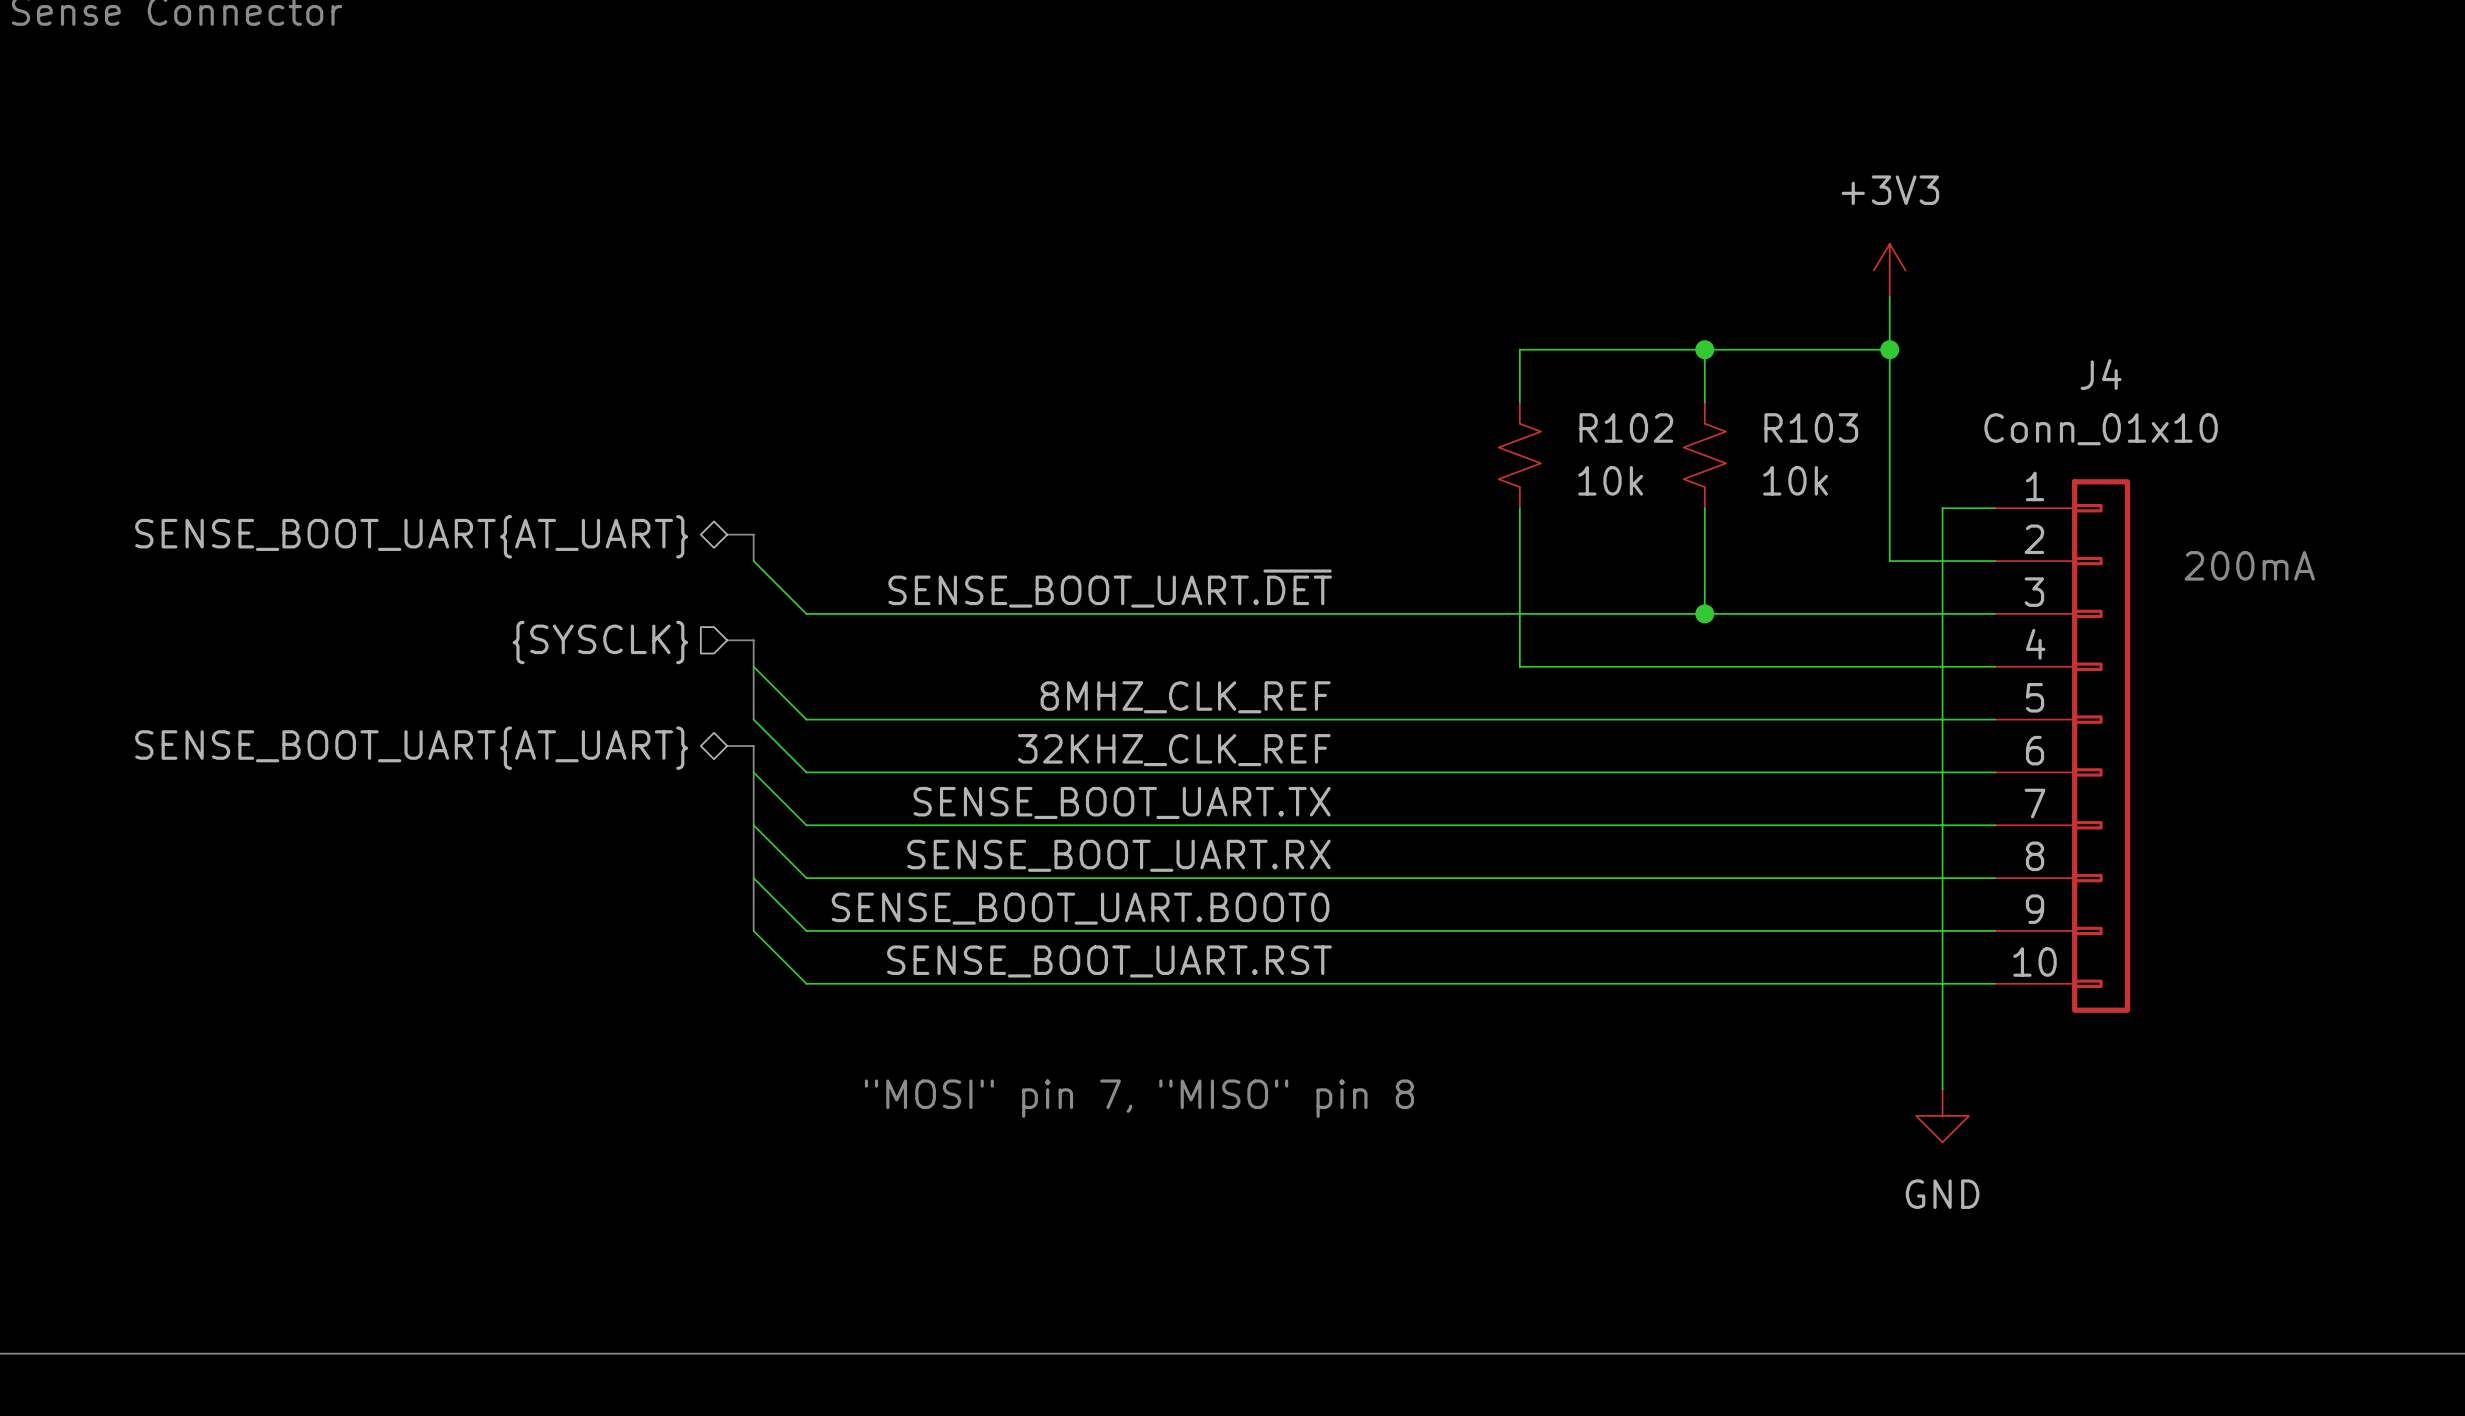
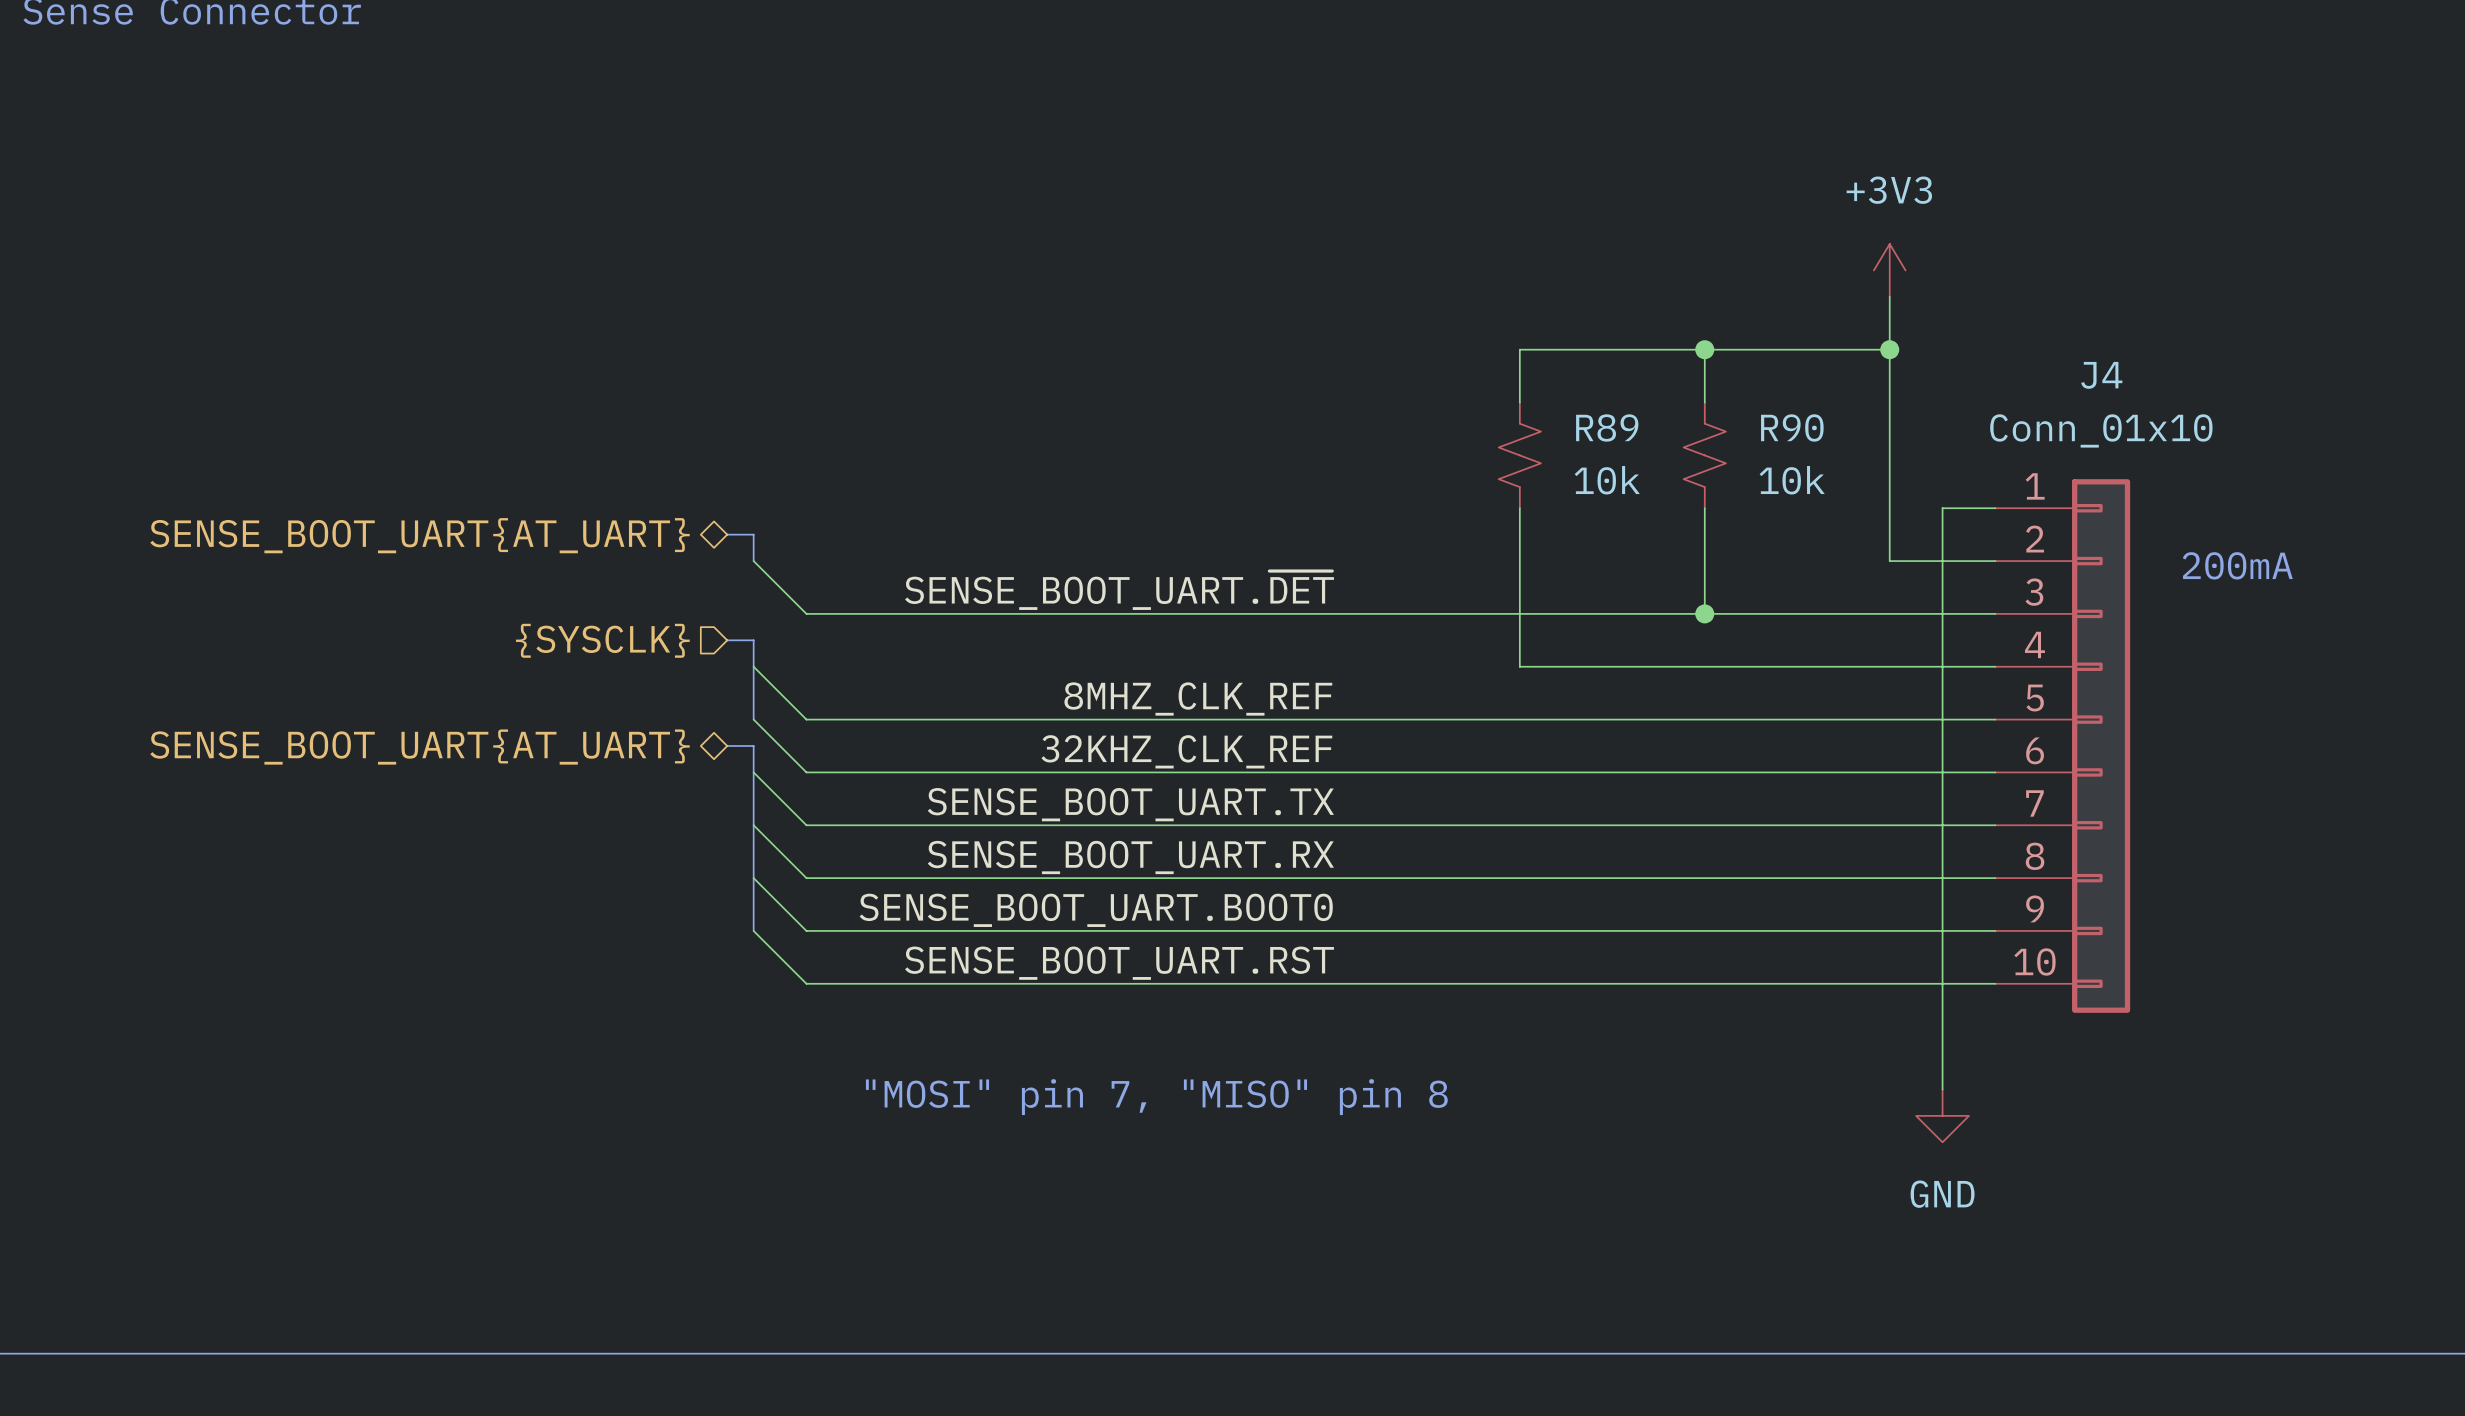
R102 name: R102 (1626, 427) -> R89 (1607, 427)
R103 name: R103 (1811, 427) -> R90 (1792, 427)

